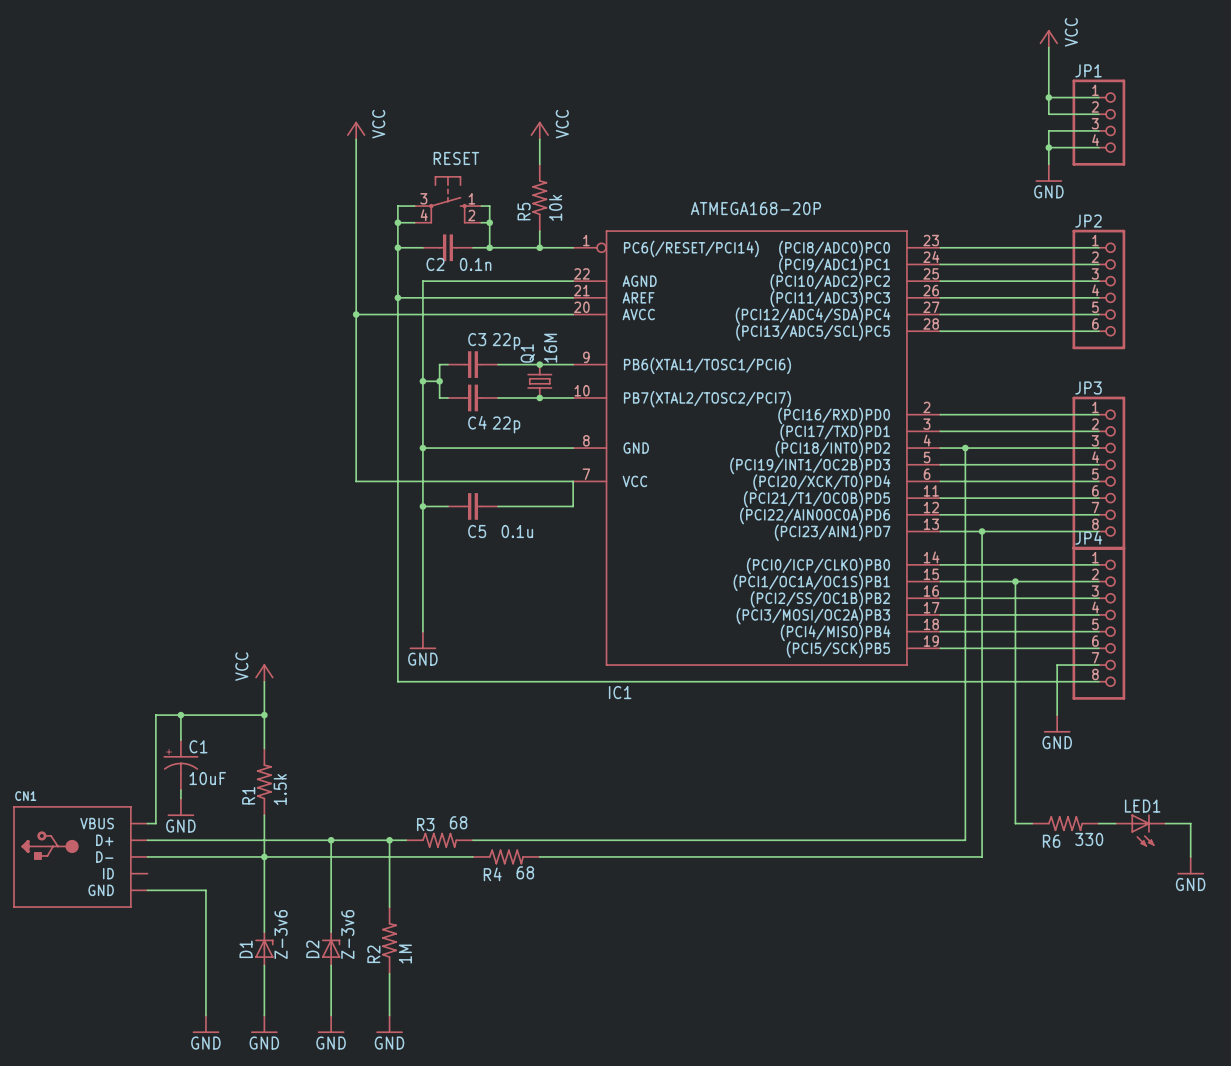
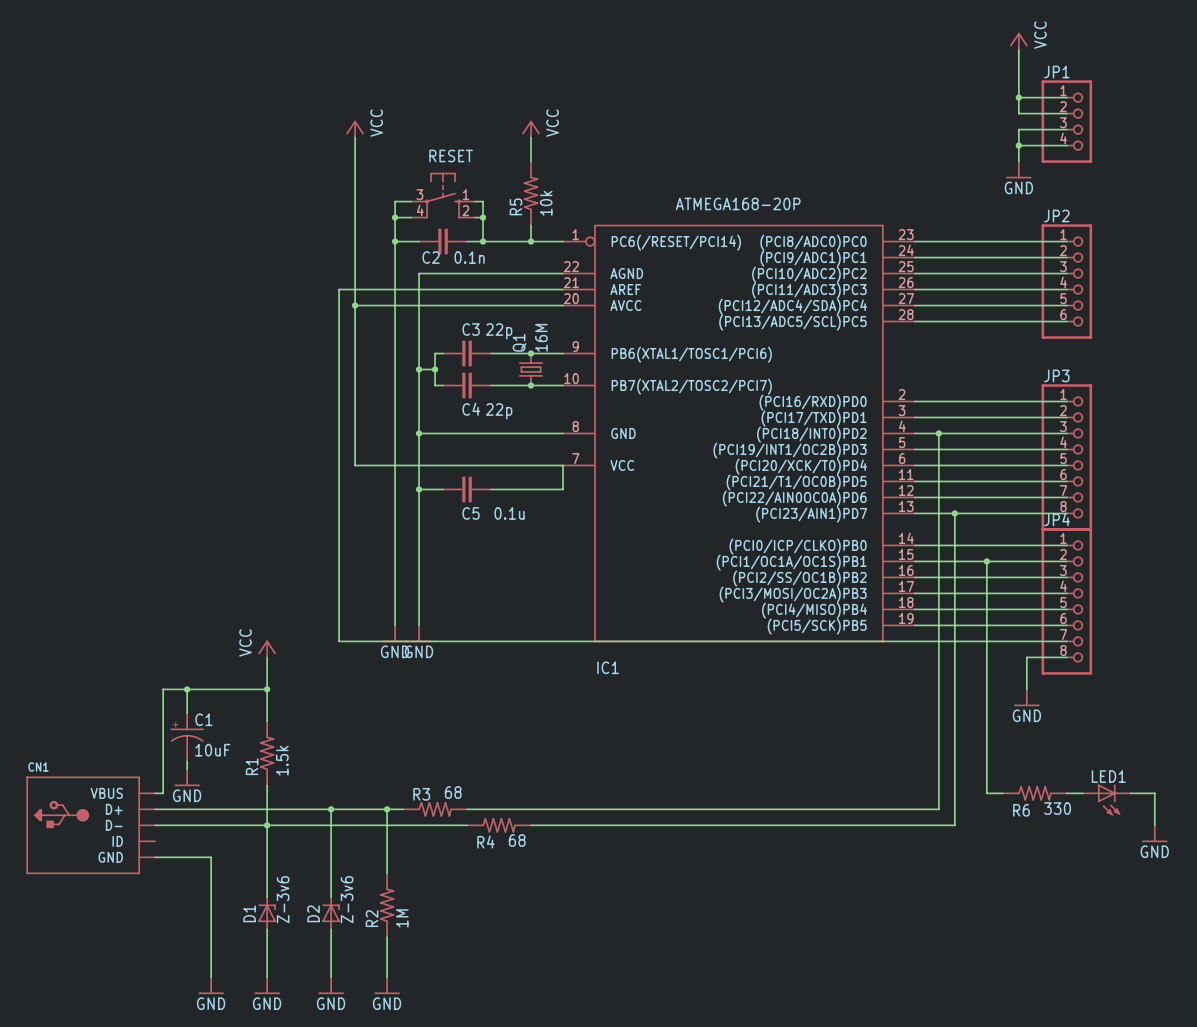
junction: (397, 297) -> none
power symbol: GND (422, 640) -> none
wire: (397, 648) (397, 681) (1057, 681) (1057, 665) -> (395, 289) (339, 289) (339, 641) (1026, 641)
power symbol: none -> GND (395, 633)
power symbol: none -> GND (419, 633)

